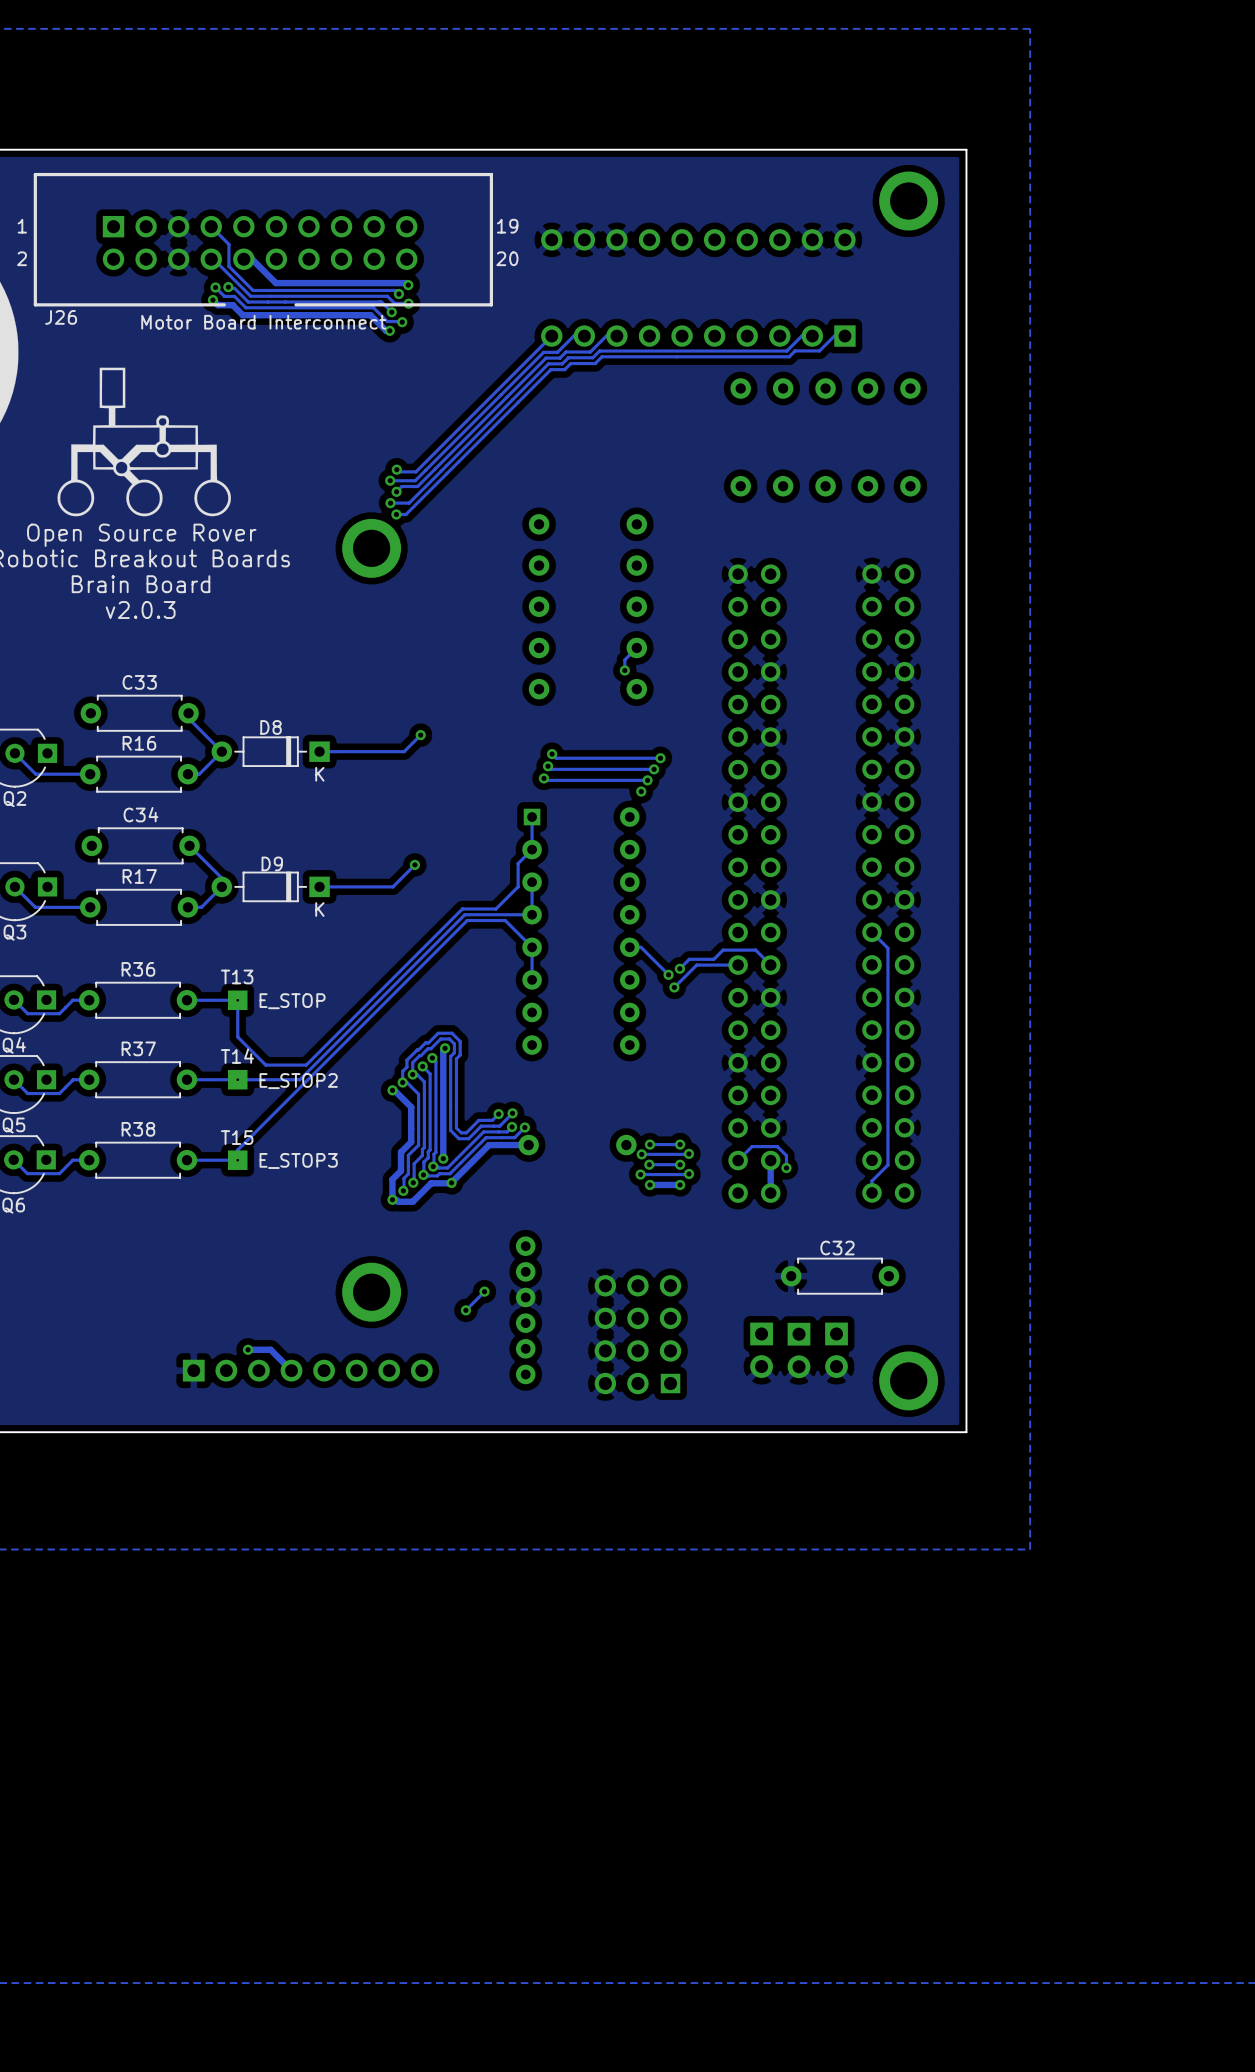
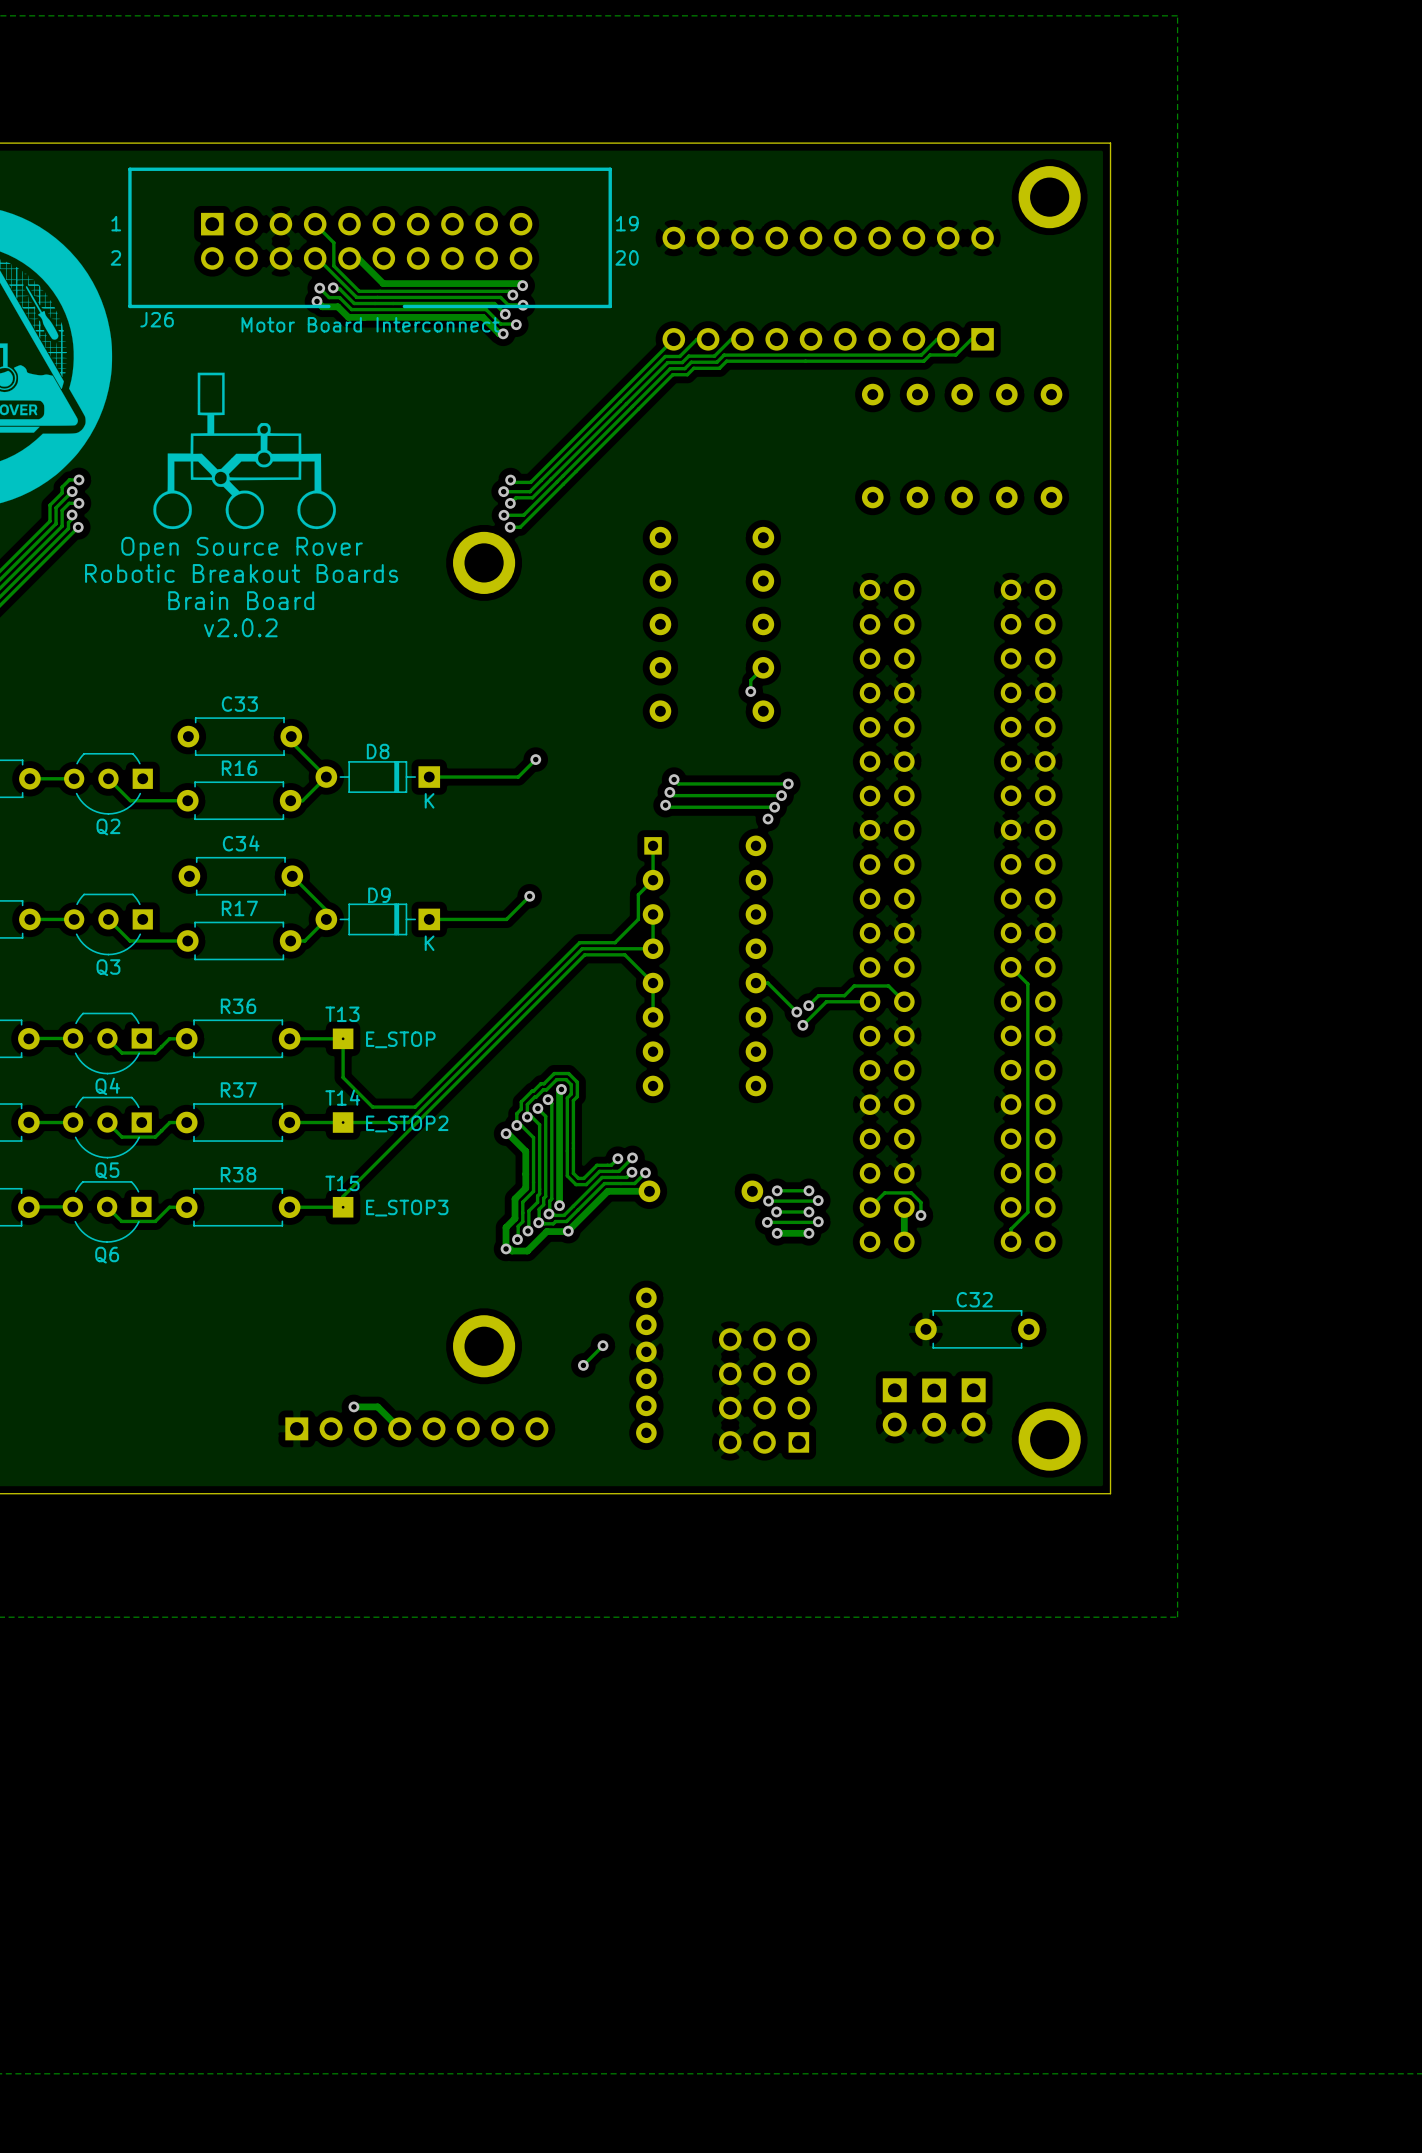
text: v2.0.3 (140, 610) -> v2.0.2 (240, 627)

